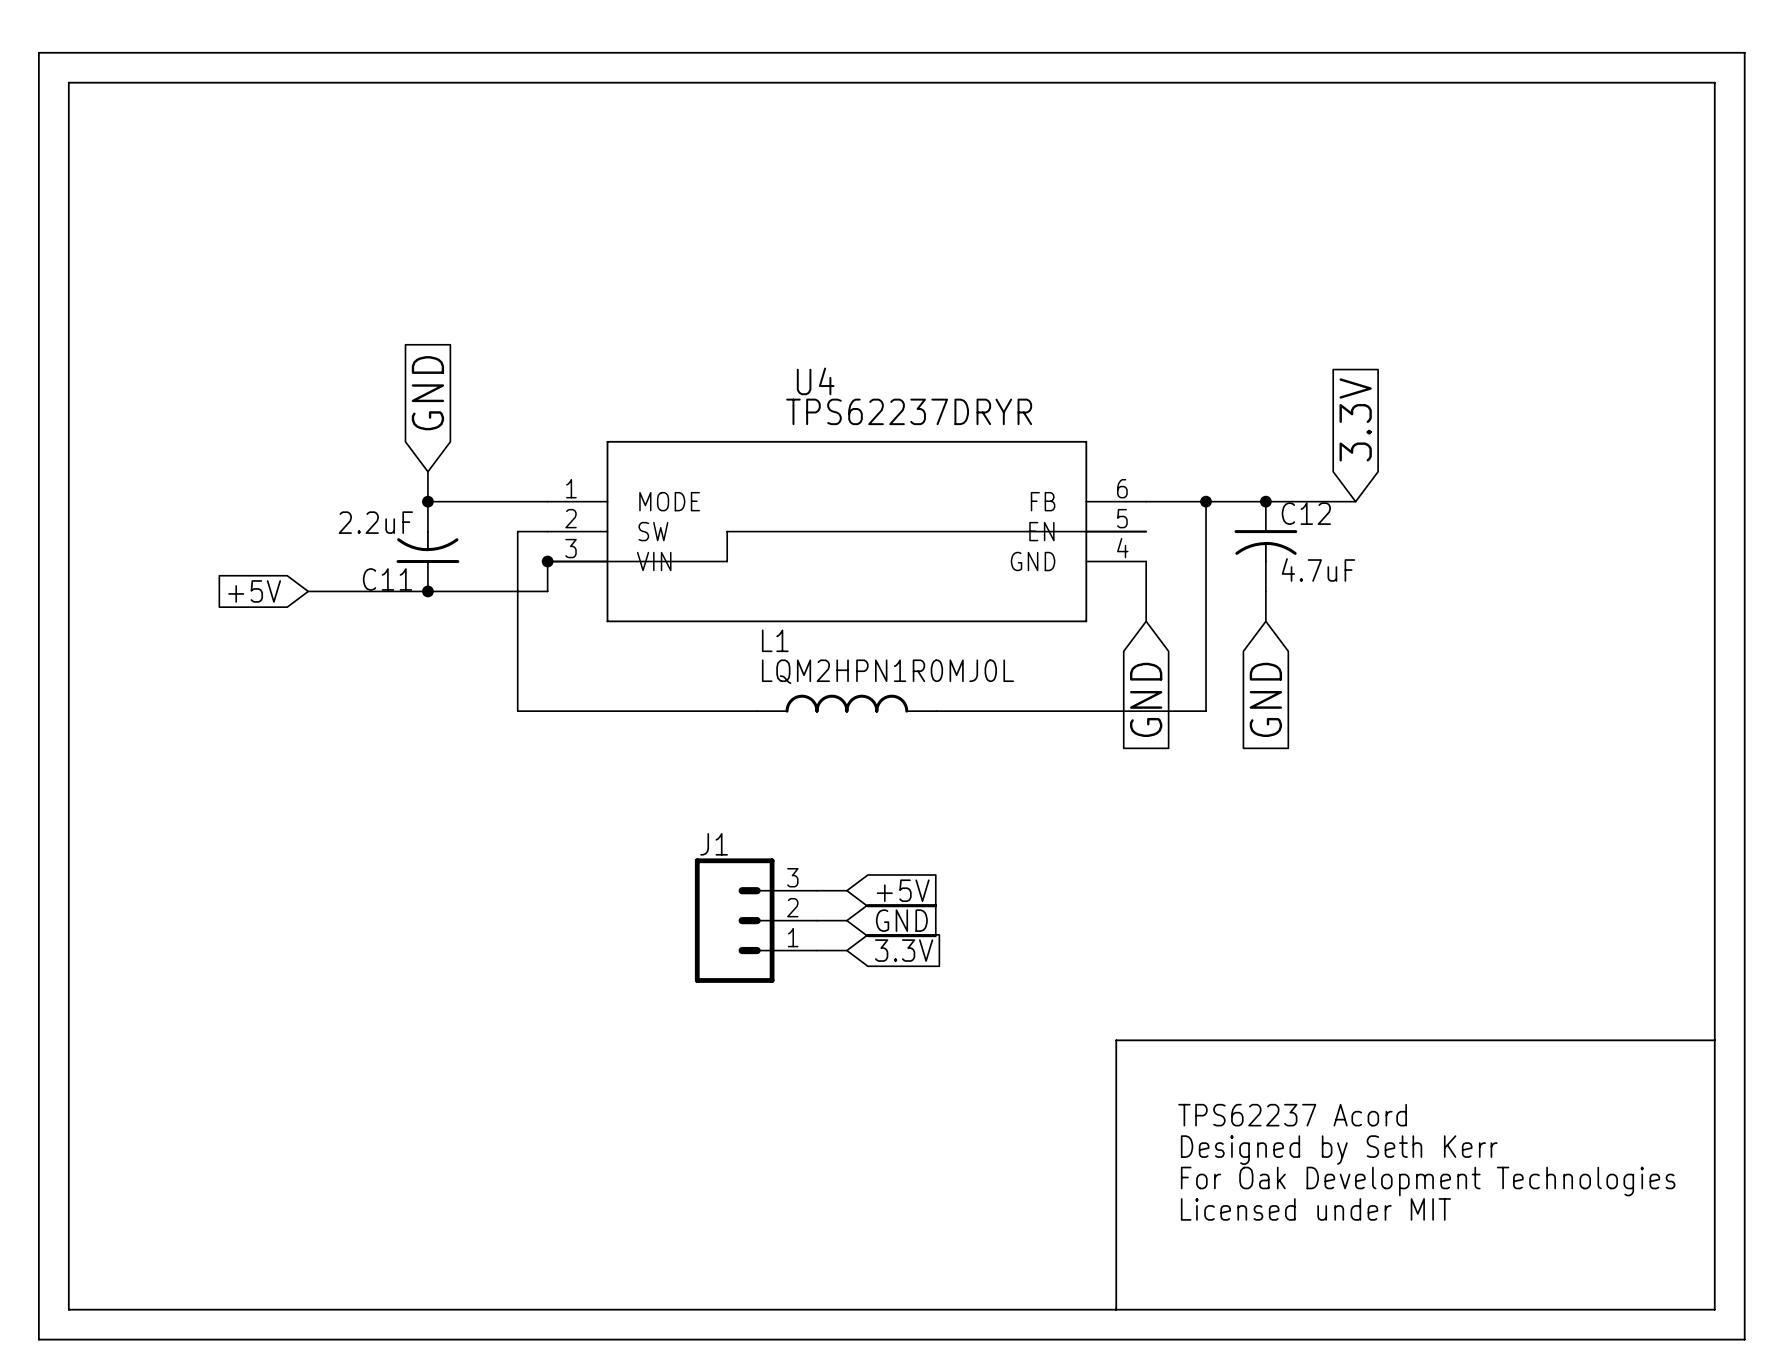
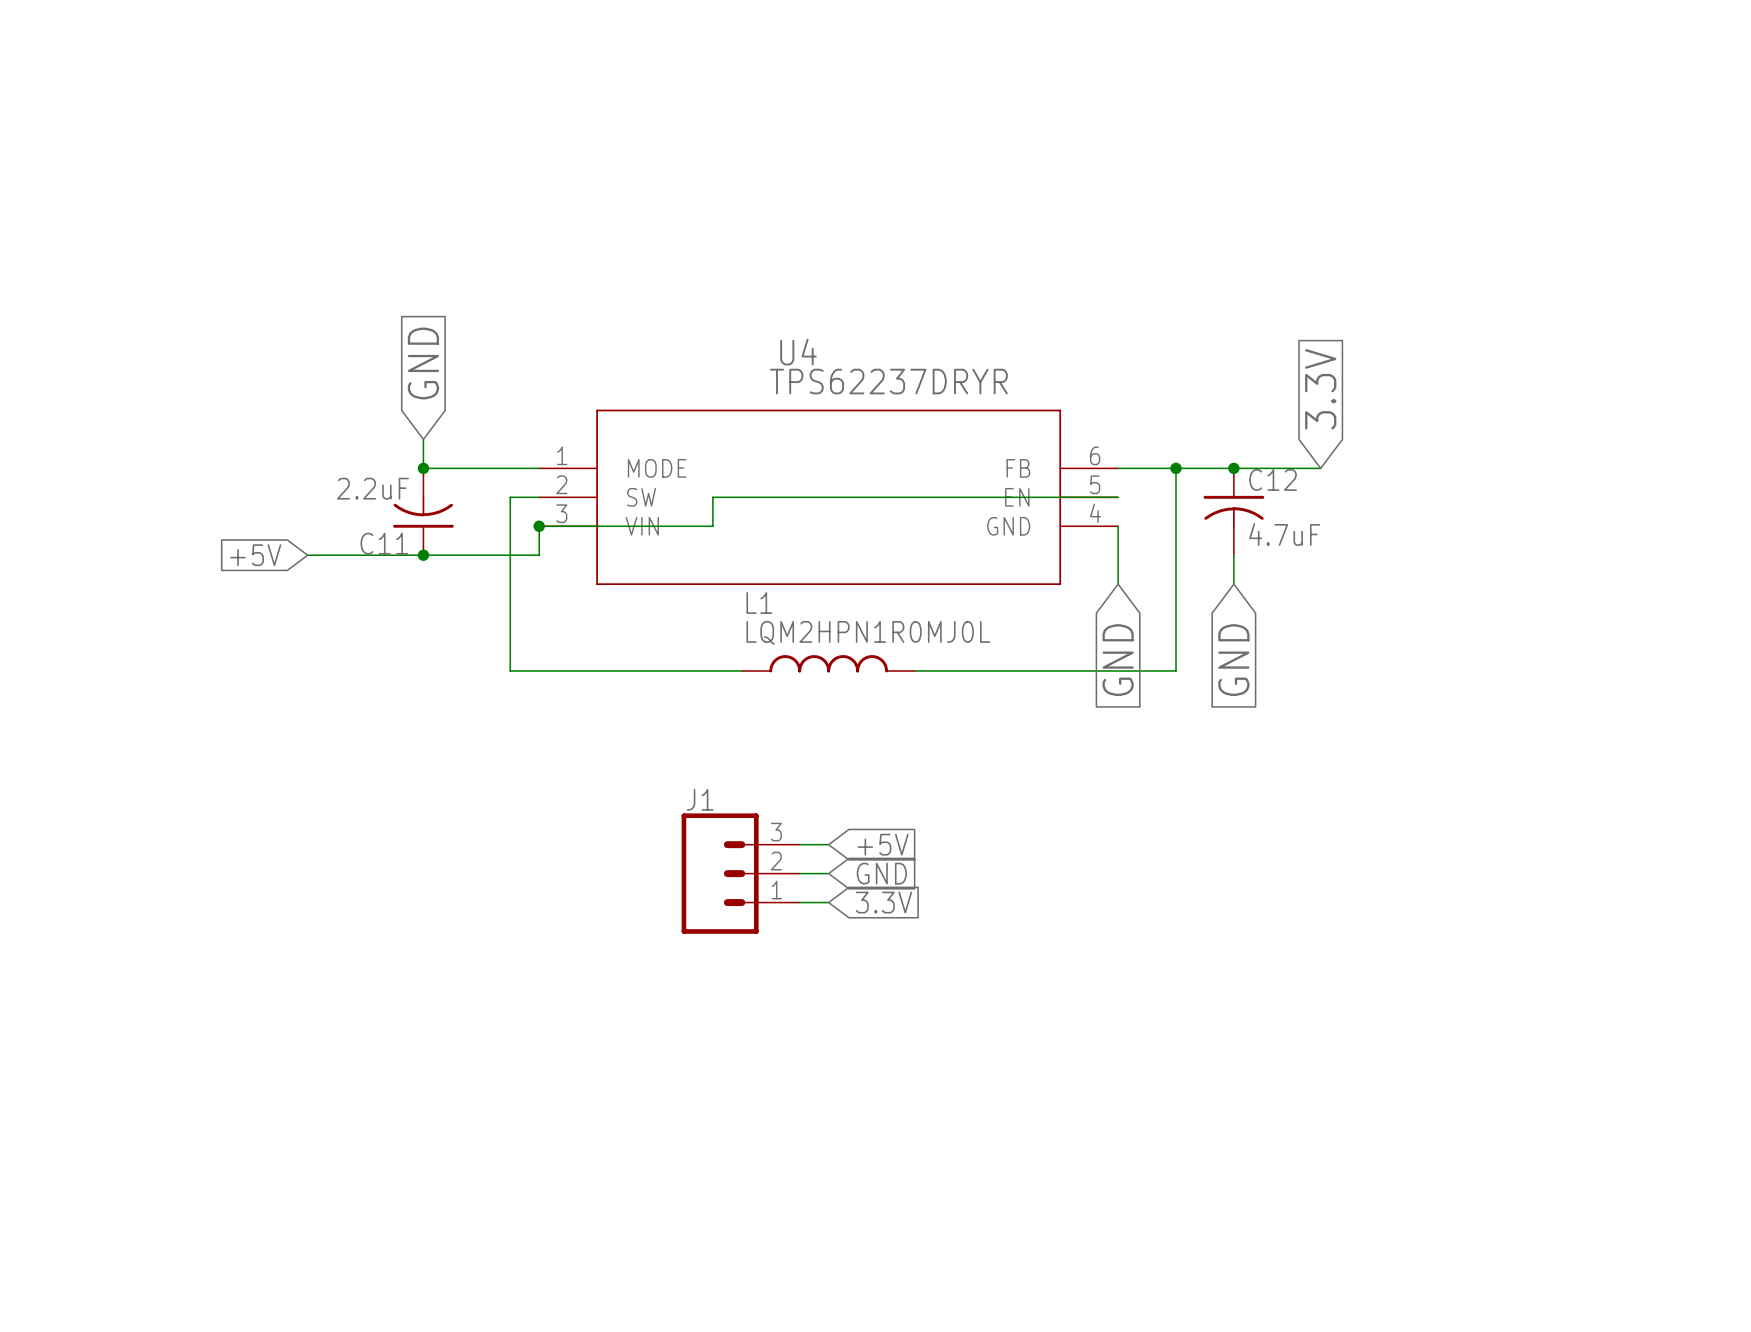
line: (38, 52) (1744, 52) (1744, 1339) (38, 1339) (38, 52) -> none
line: (68, 82) (1714, 82) (1714, 1309) (68, 1309) (68, 82) -> none
line: (1714, 1040) (1116, 1040) (1116, 1309) -> none
text: TPS62237 Acord (1292, 1115) -> none
text: Designed by Seth Kerr (1339, 1150) -> none
text: For Oak Development Technologies (1428, 1181) -> none
text: Licensed under MIT (1315, 1209) -> none

